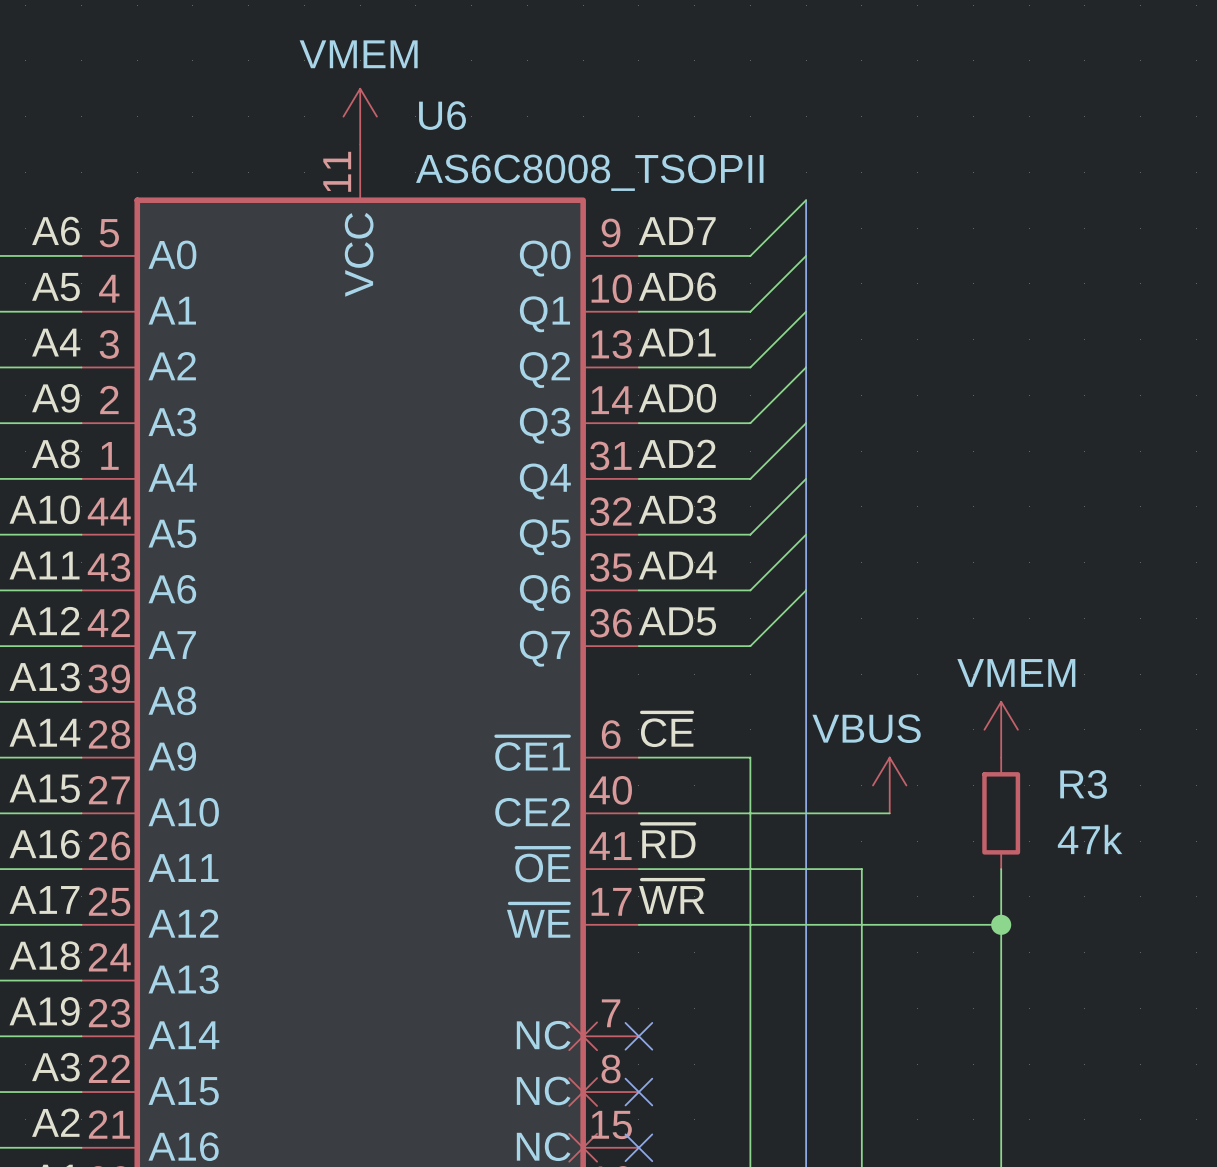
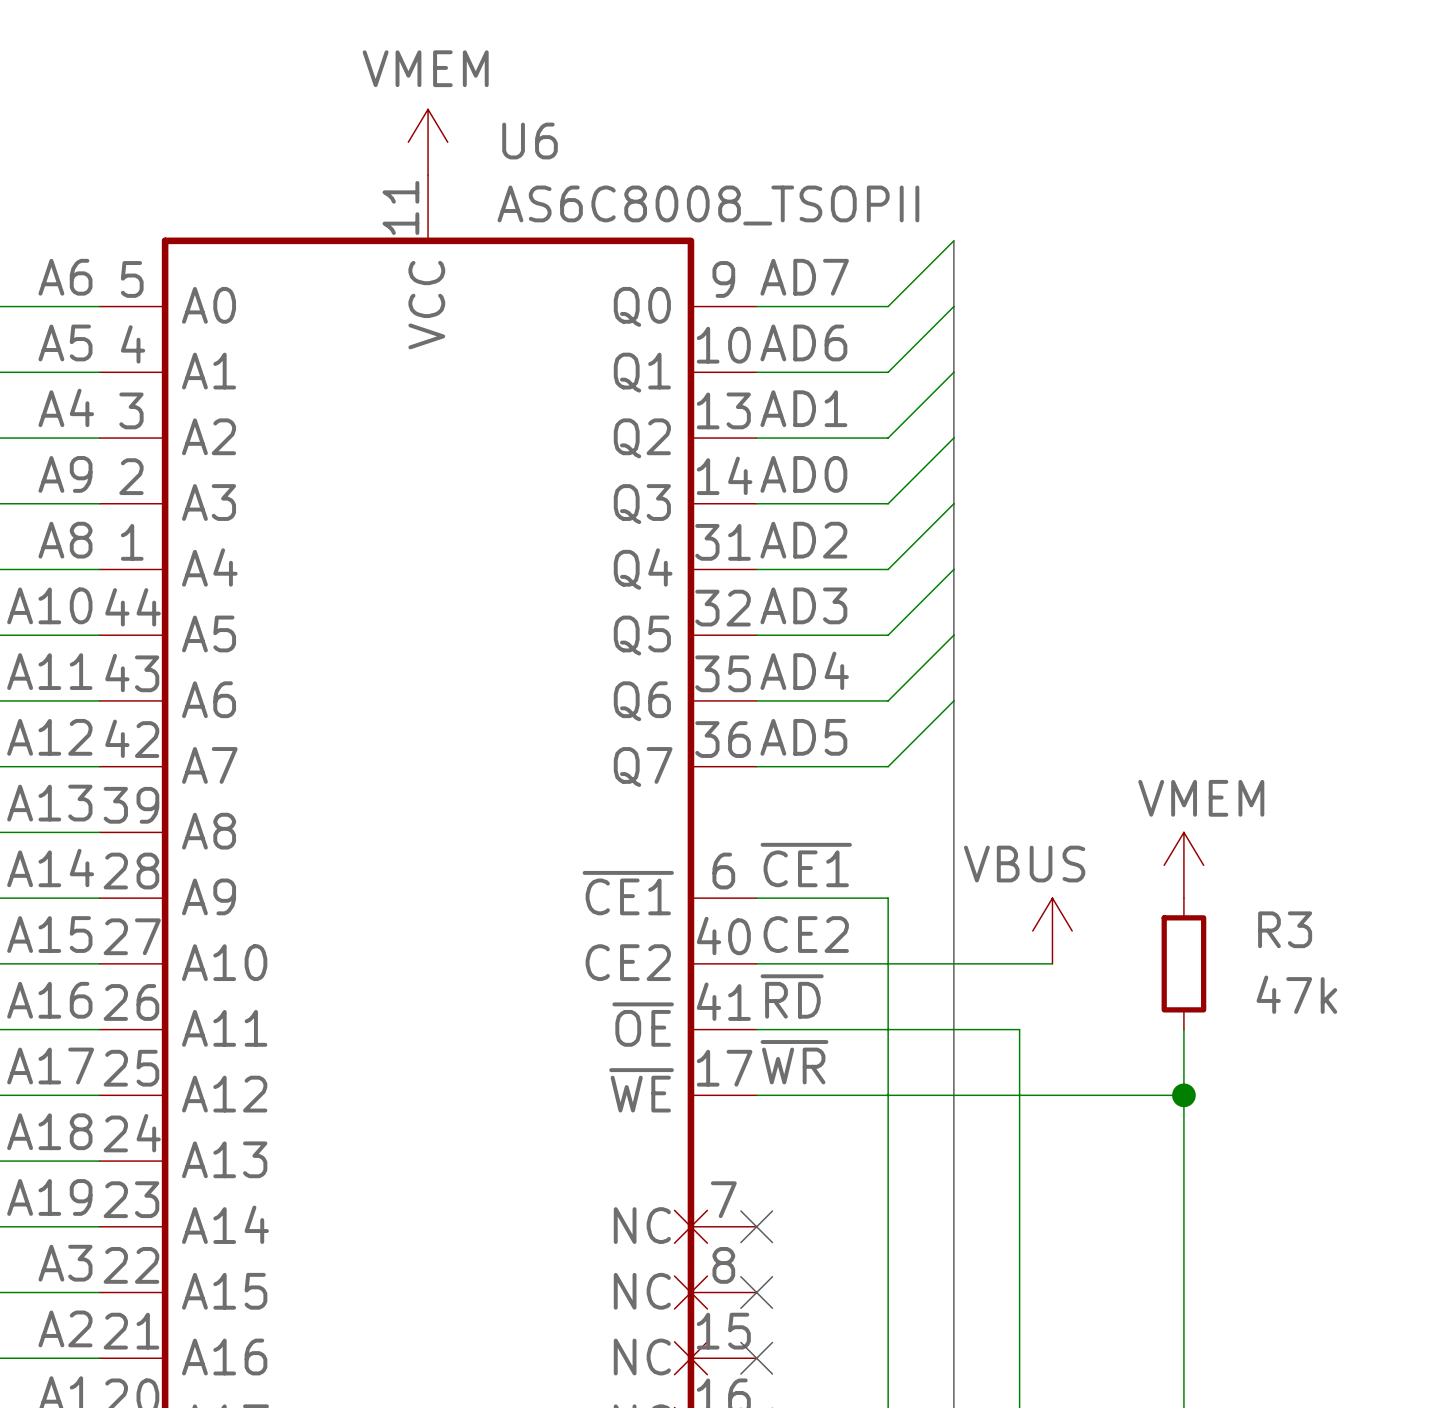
label: ~{CE} (667, 729) -> ~{CE1} (806, 865)
label: none -> CE2 (806, 934)

